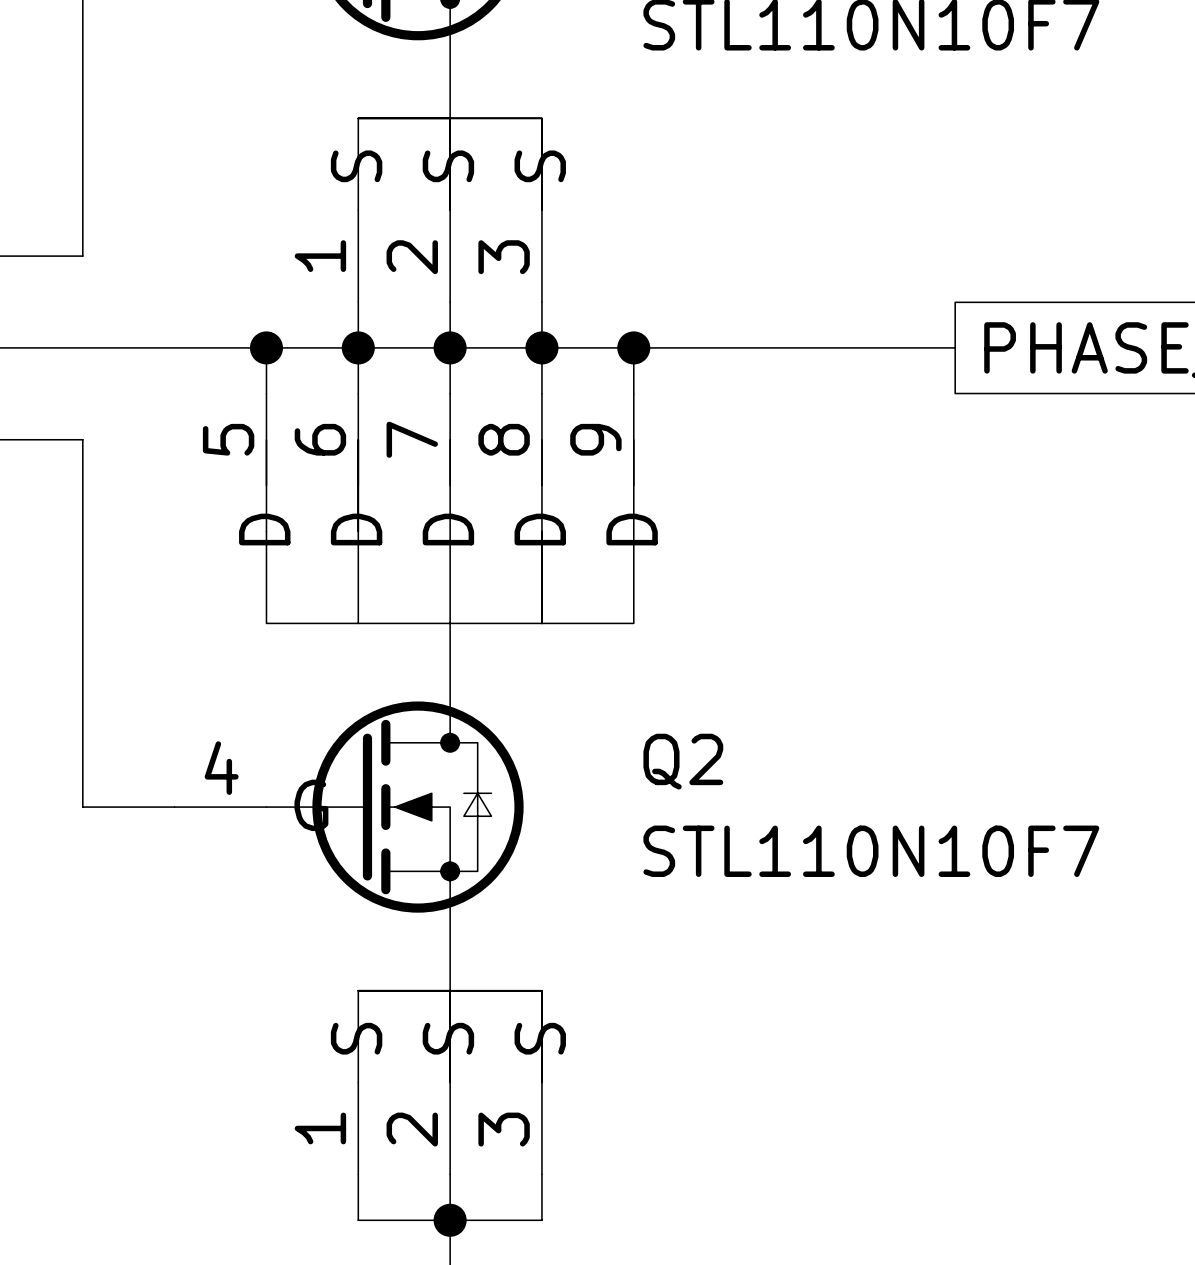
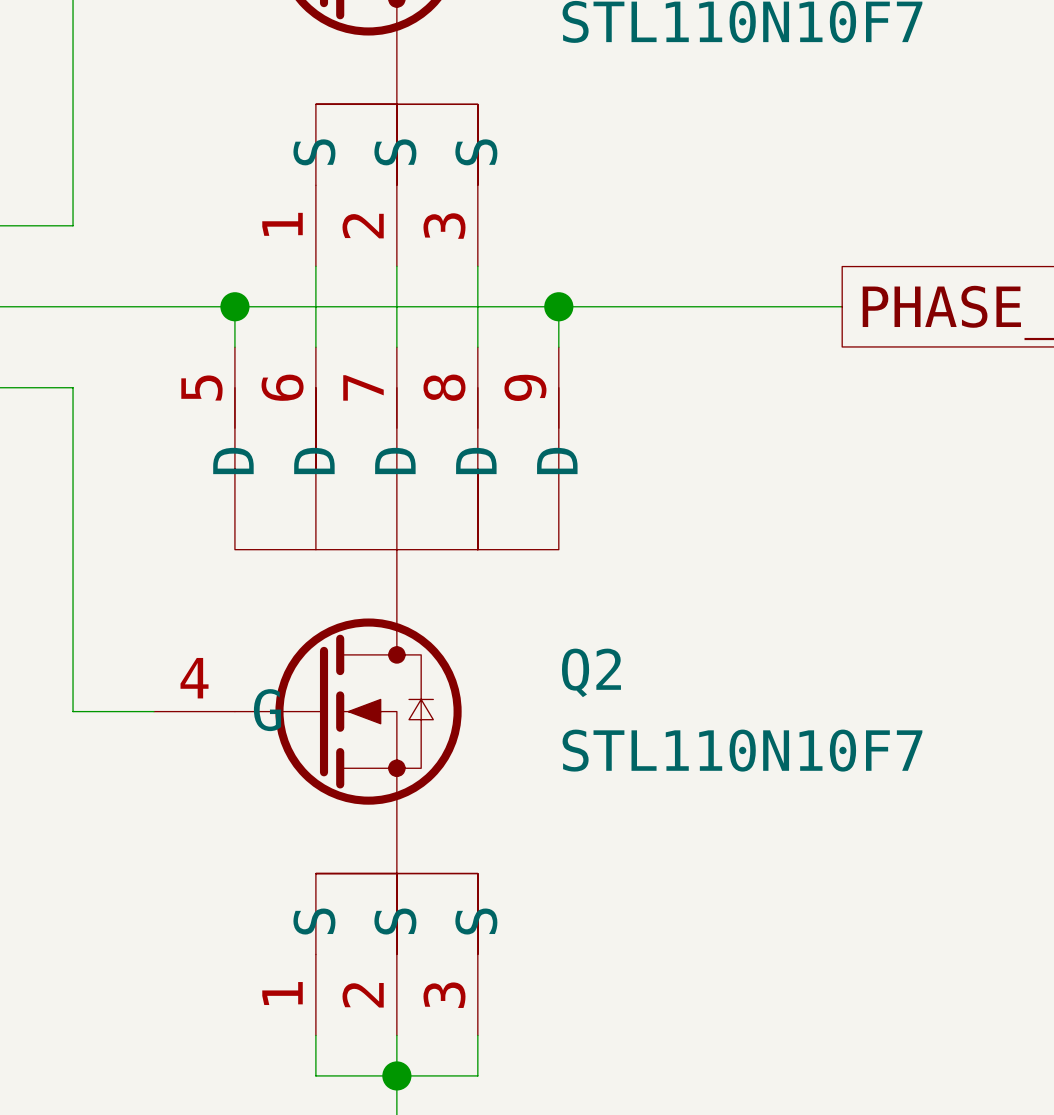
junction: (358, 347) -> none
junction: (450, 347) -> none
junction: (541, 347) -> none

